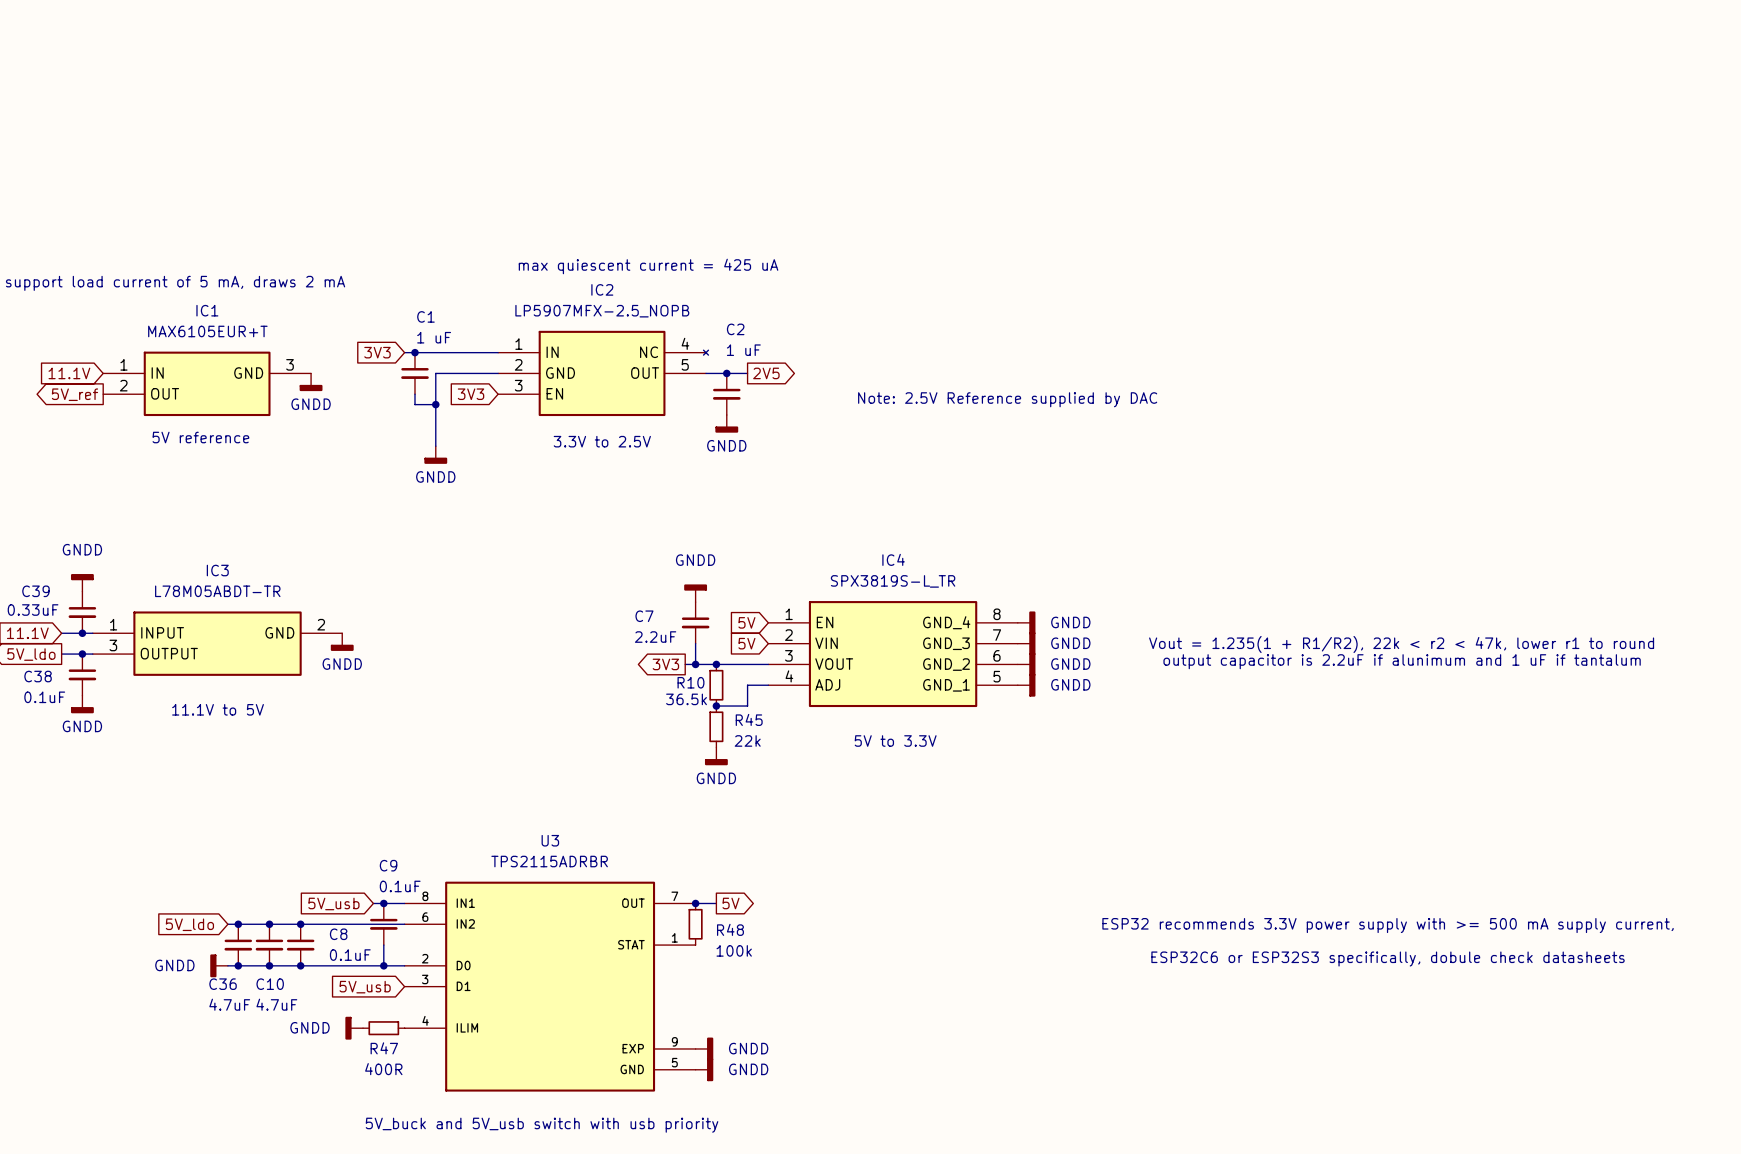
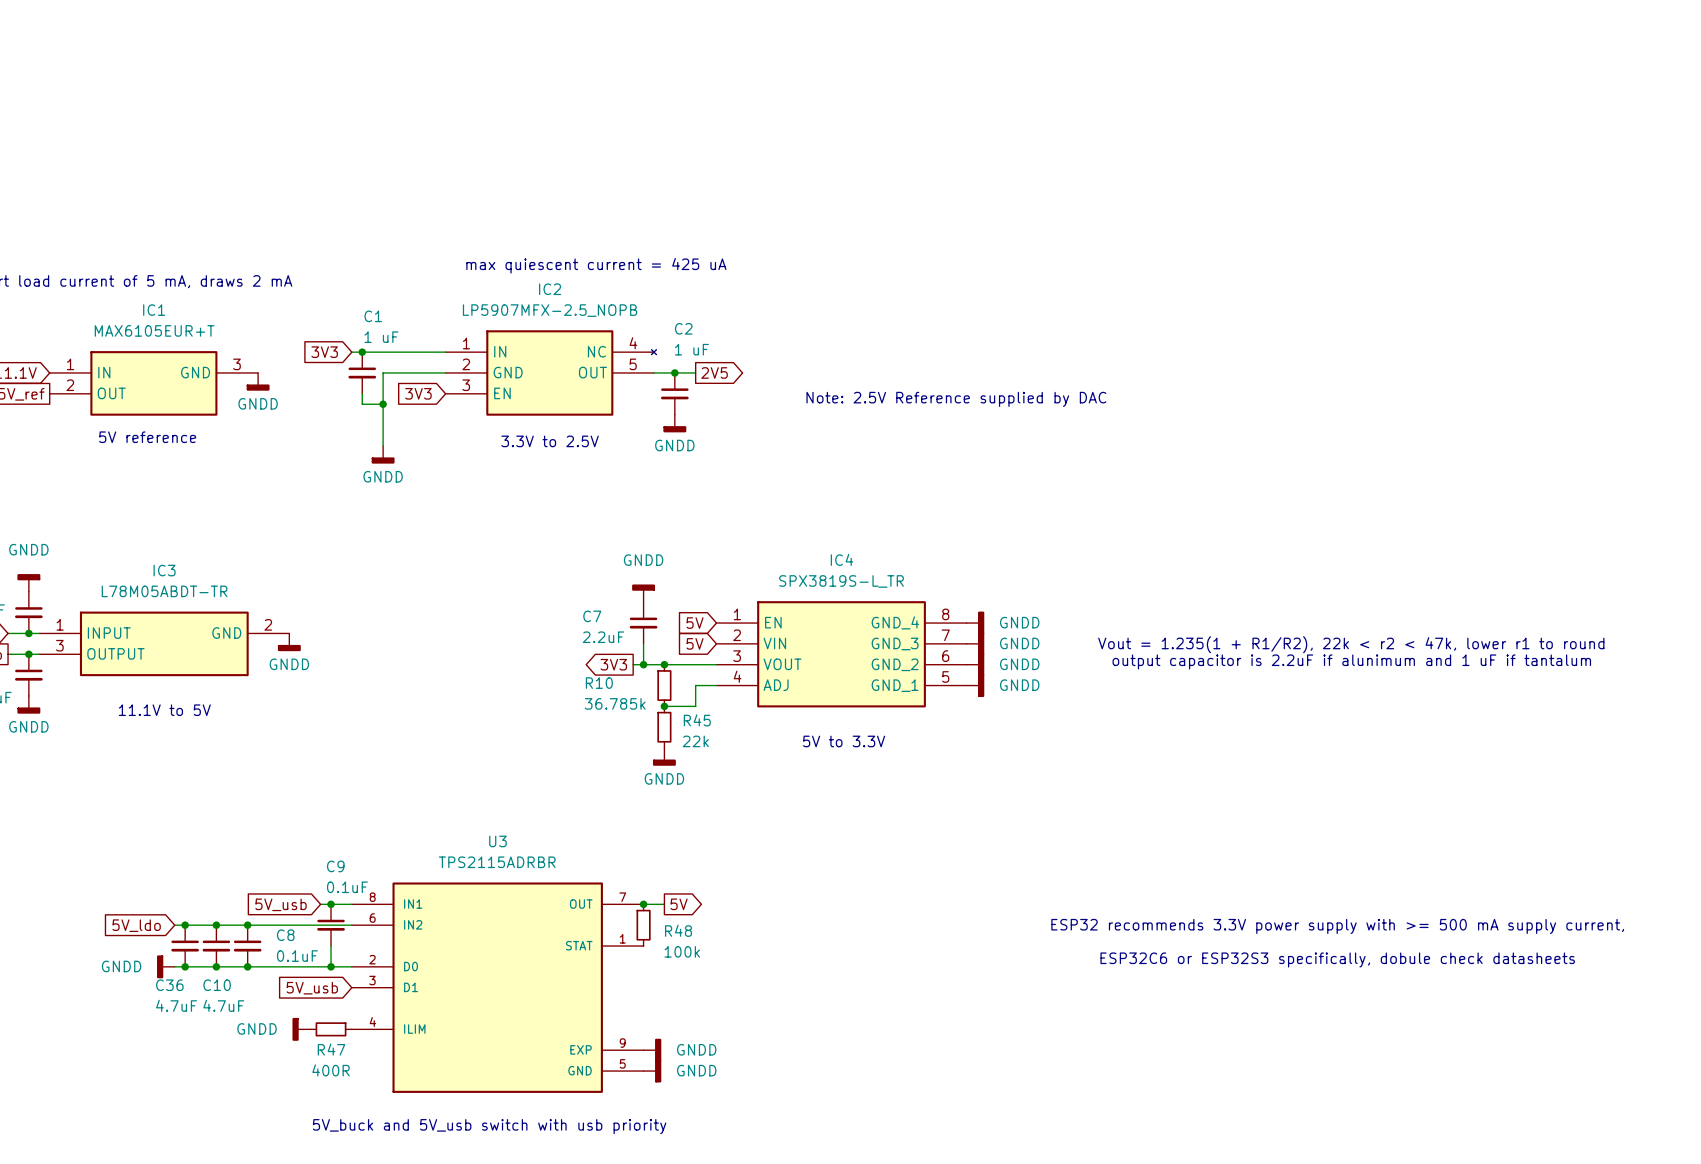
R10 name position: R10 (690, 682) -> R10 (599, 683)
R10 value: 36.5k (686, 699) -> 36.785k (615, 703)

